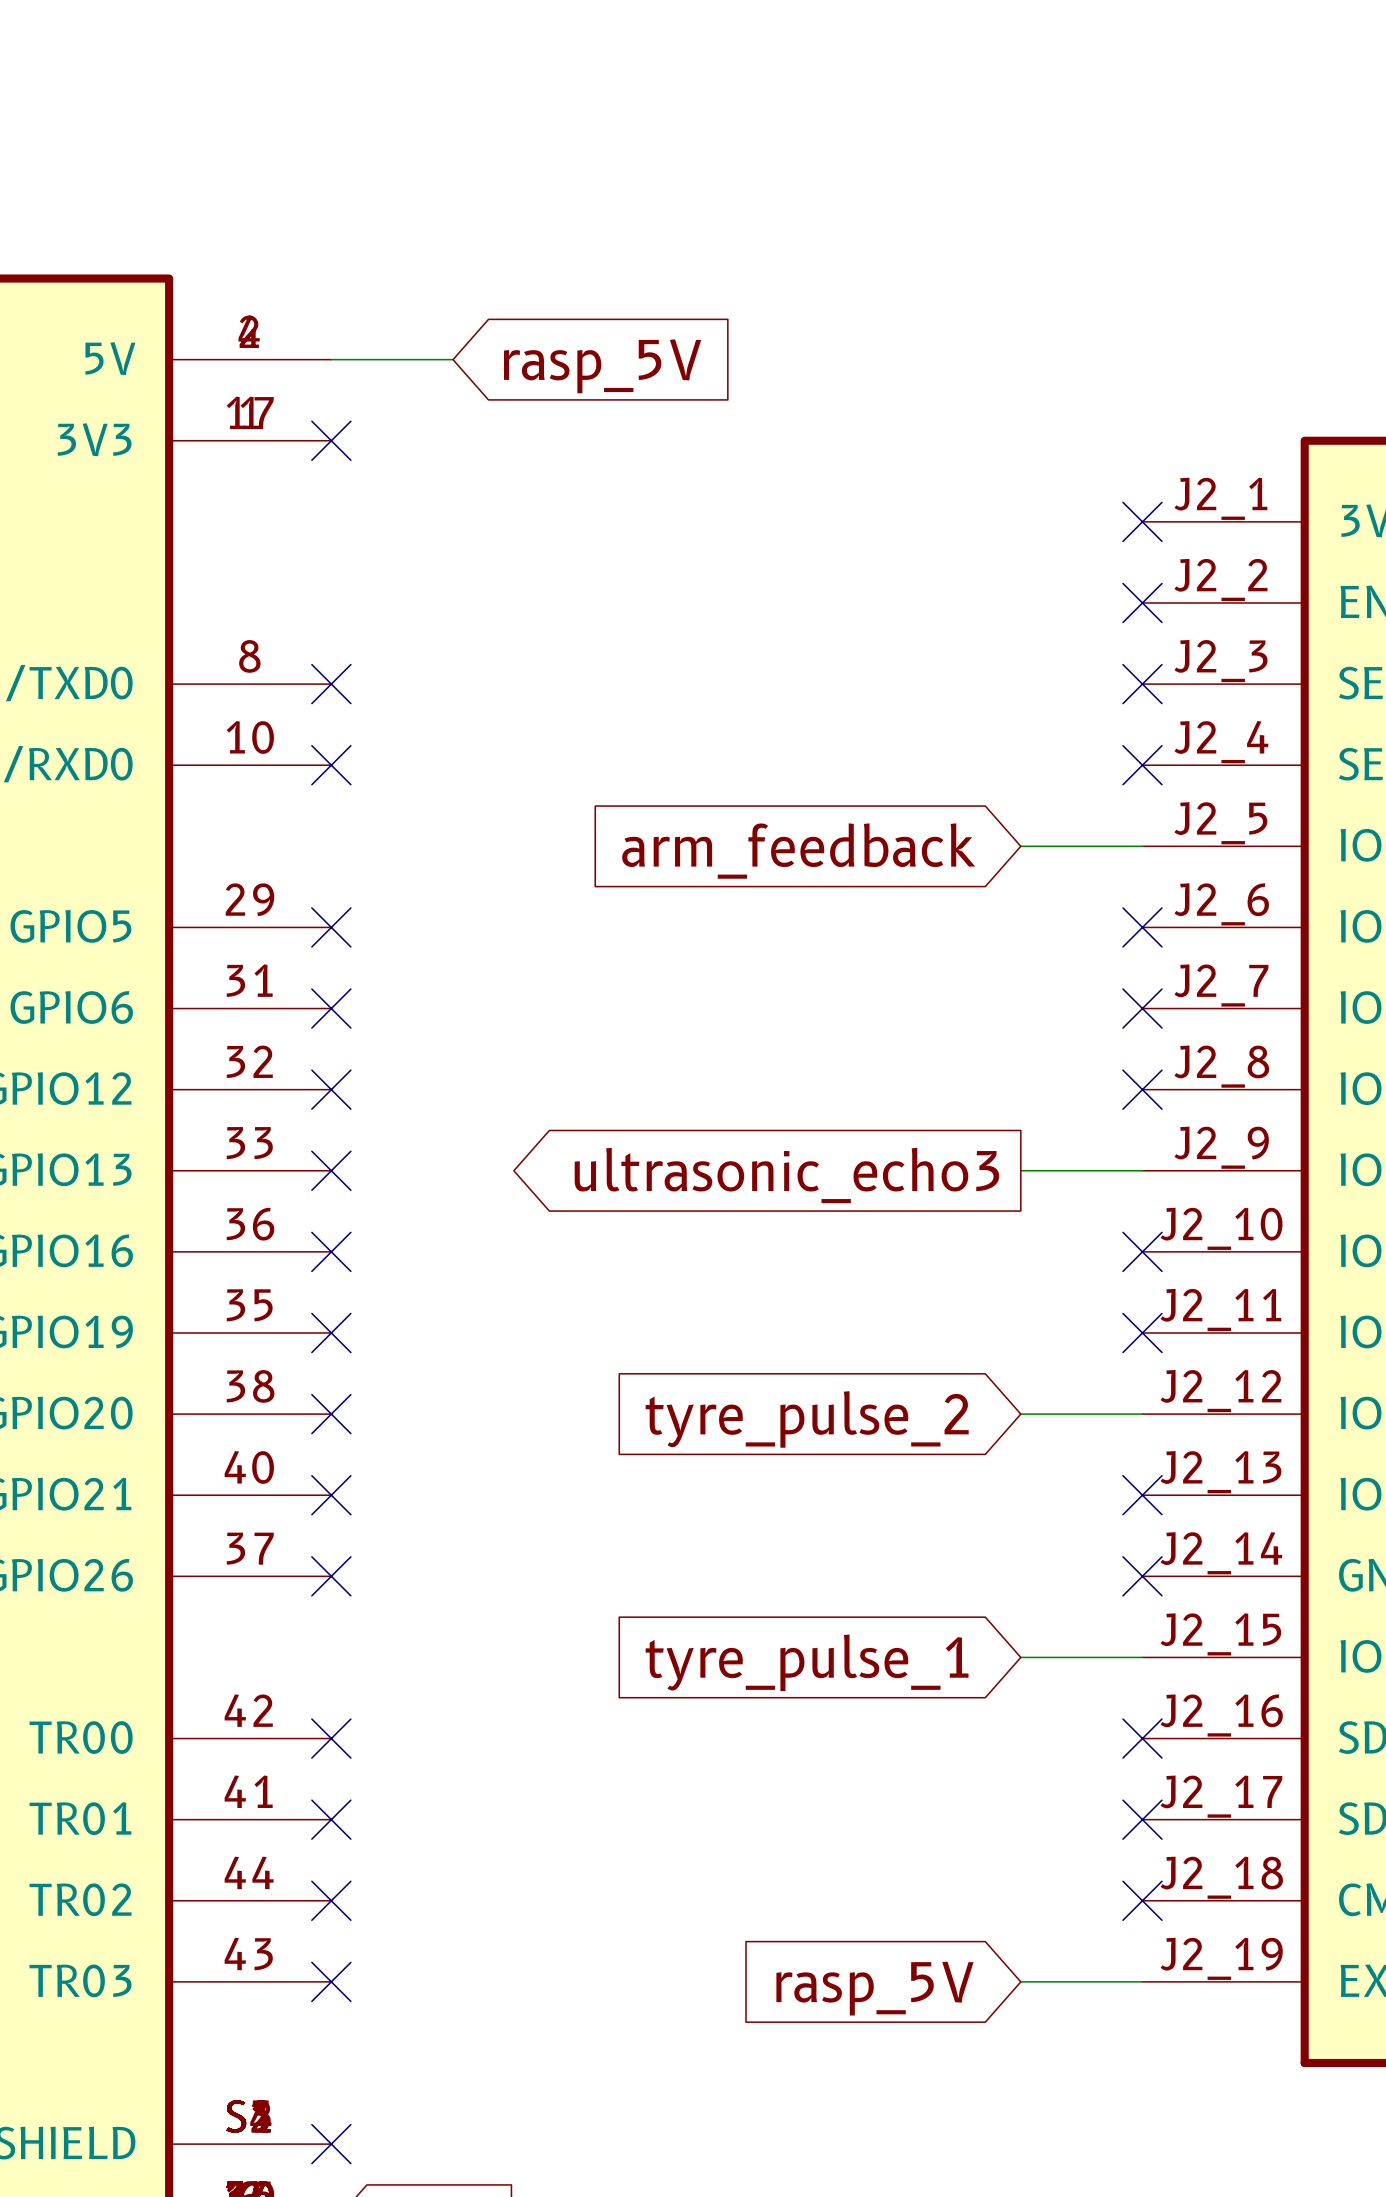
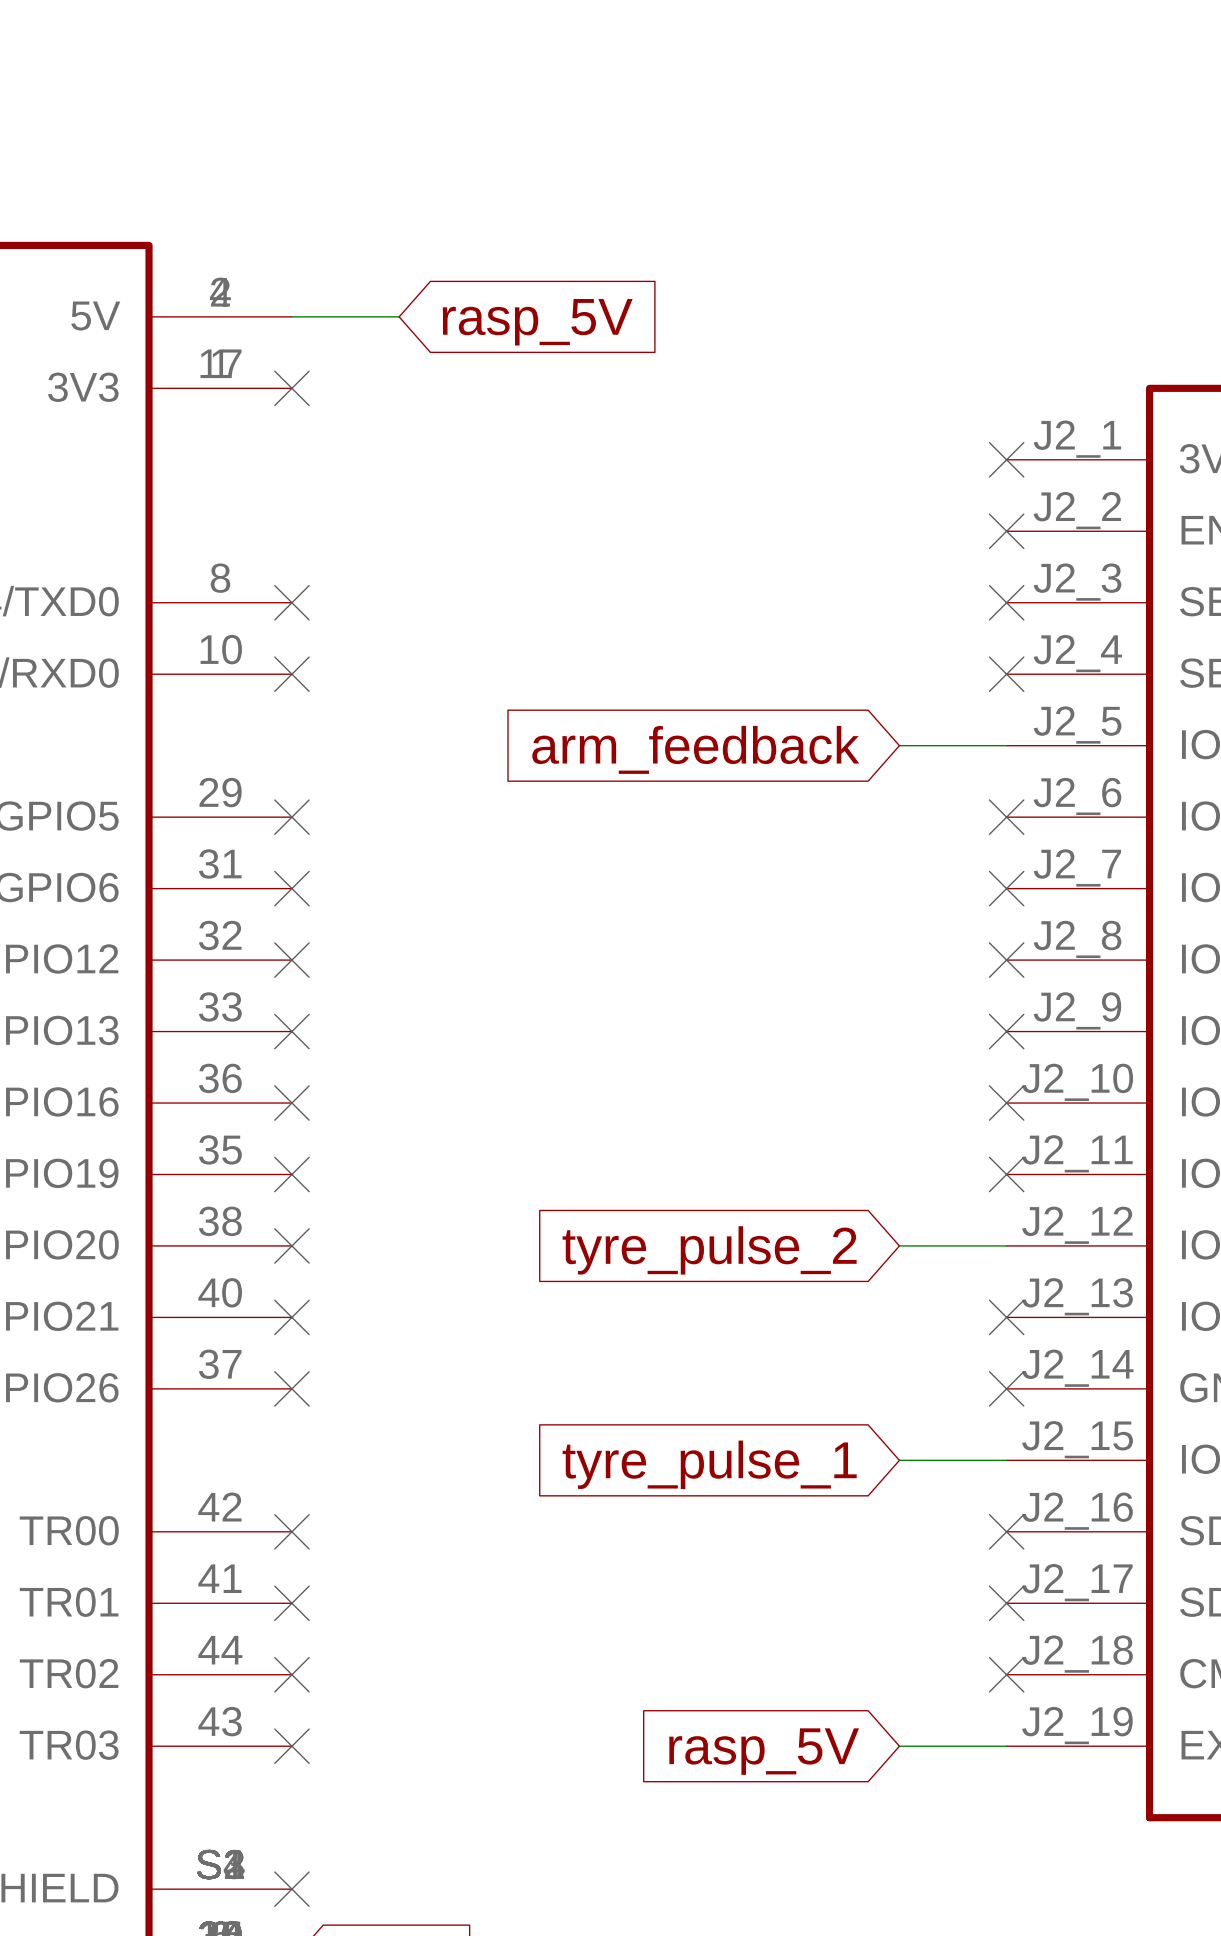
wire: (1020, 1170) (1142, 1170) -> none
no-connect mark: none -> (1006, 1031)
global label: ultrasonic_echo3 (786, 1175) -> none

